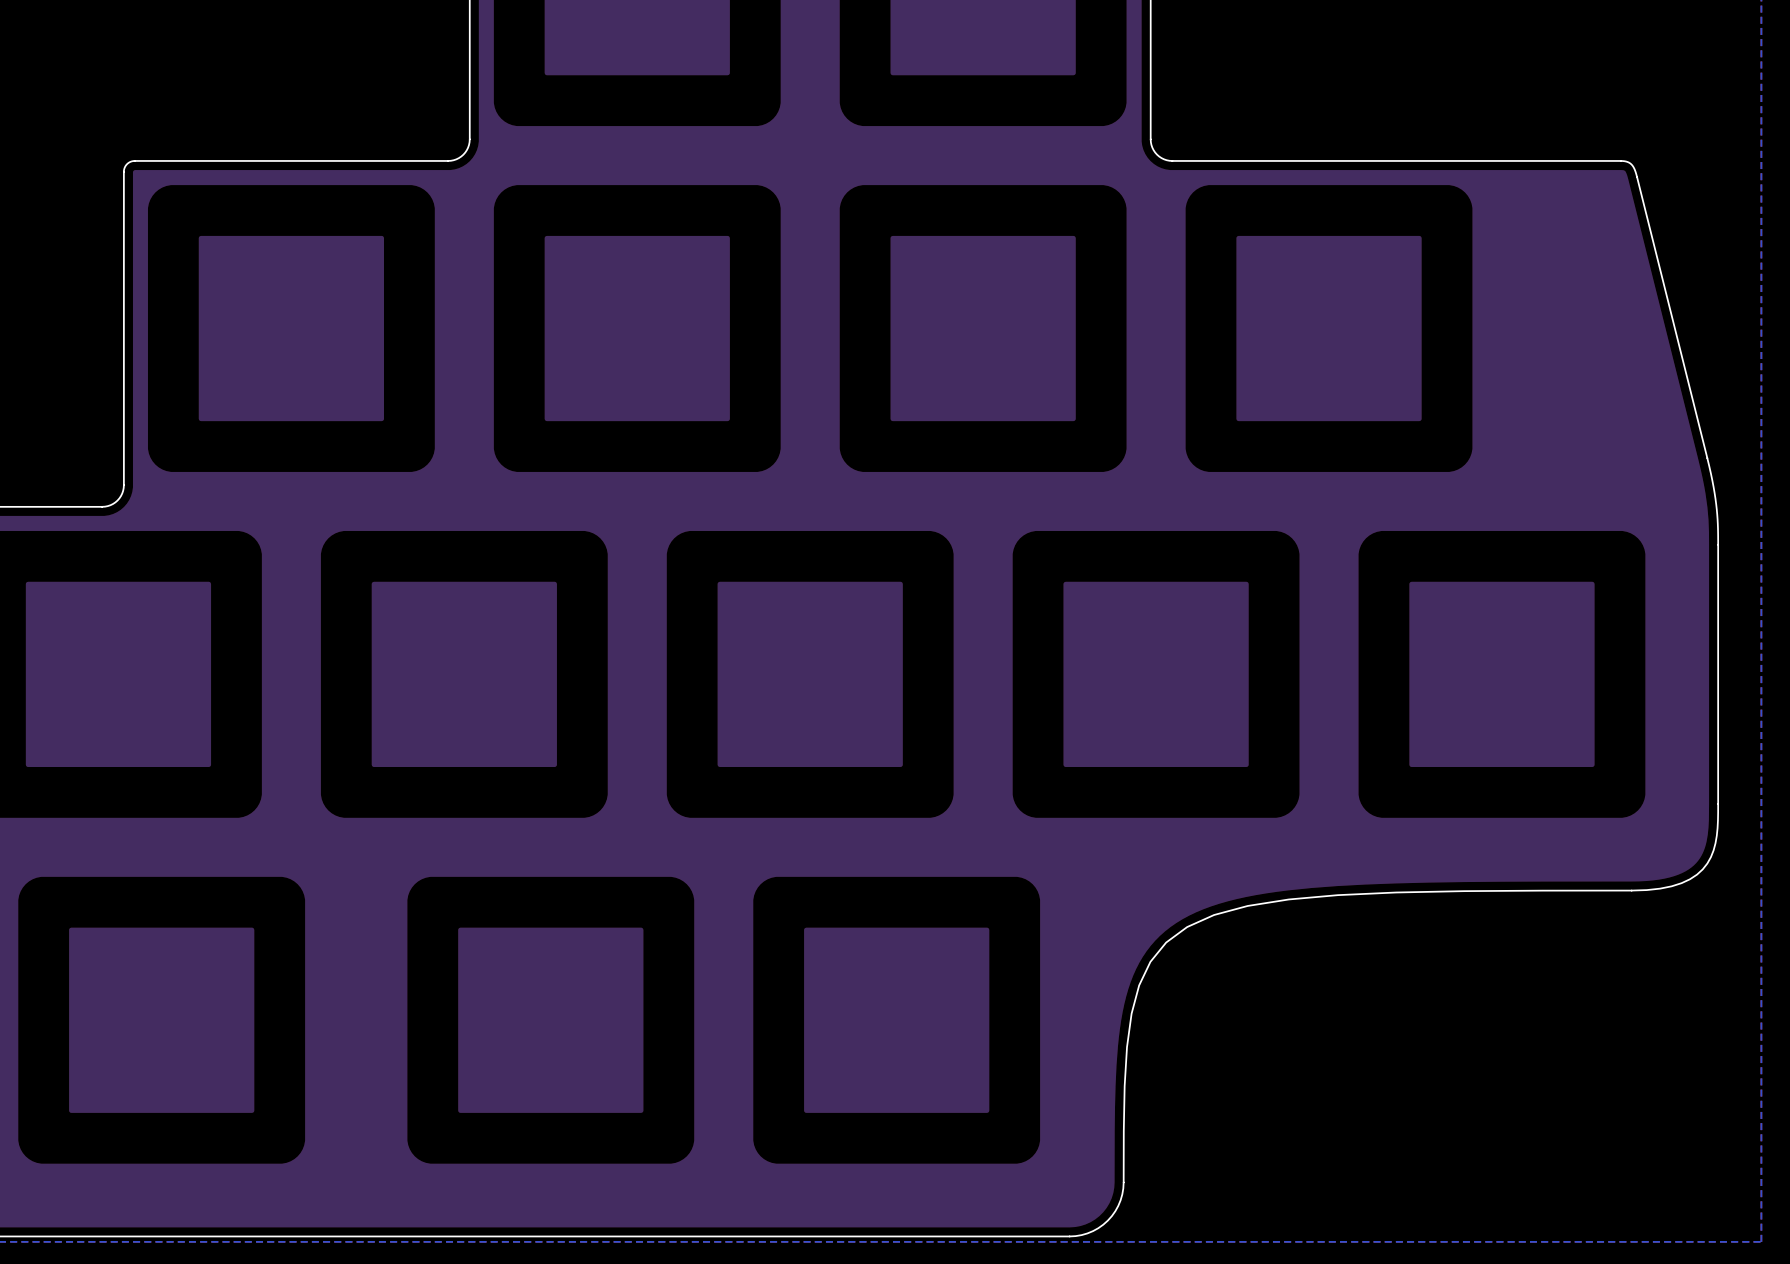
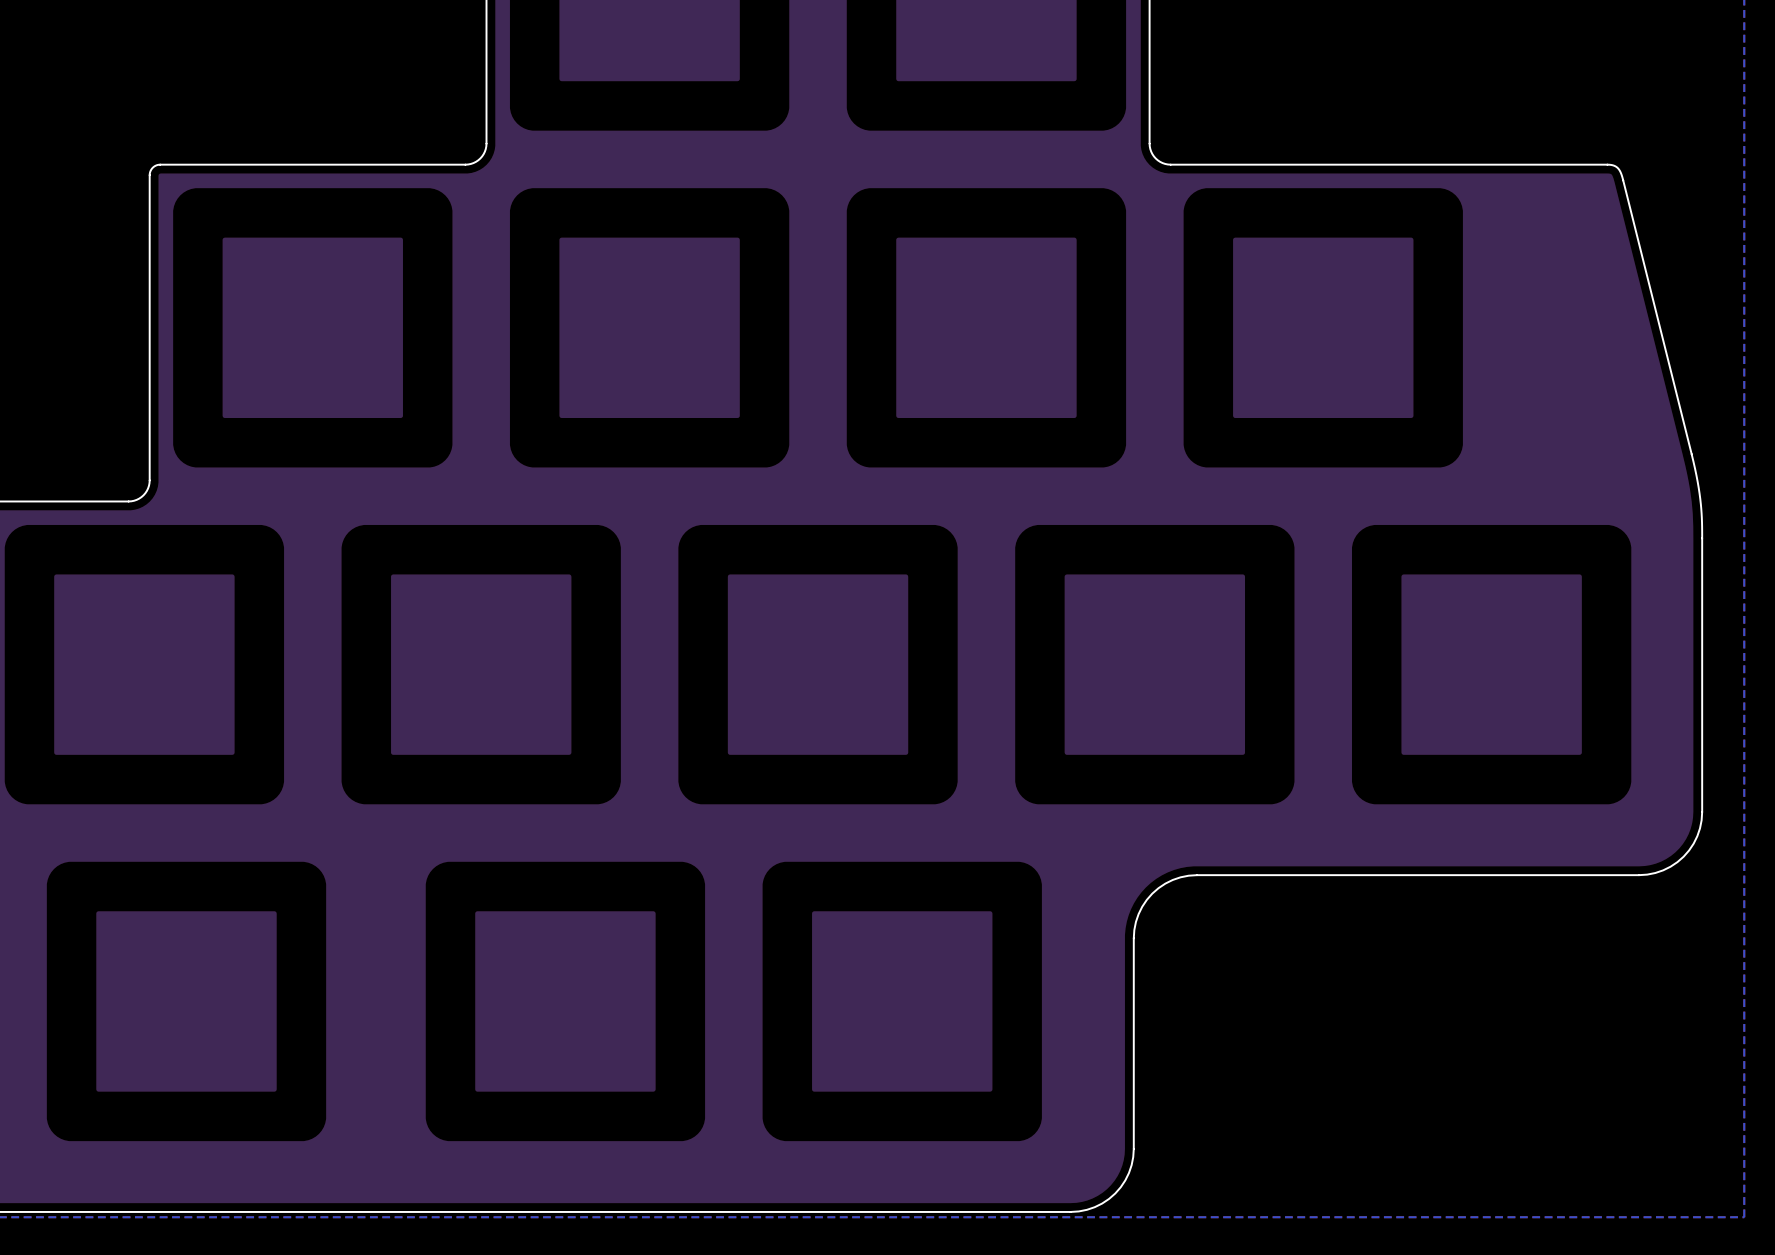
board edge: (1718, 804) (1716, 835) (1710, 857) (1697, 874) (1671, 886) (1631, 890) (1463, 891) (1337, 895) (1288, 899) (1247, 905) (1214, 915) (1187, 927) (1166, 942) (1150, 961) (1139, 985) (1131, 1013) (1124, 1086) (1123, 1182) (1120, 1200) (1111, 1216) (1098, 1228) (1081, 1235) (1069, 1236) -> (1702, 790) (1701, 820) (1693, 843) (1677, 862) (1663, 870) (1647, 874) (1196, 875) (1180, 877) (1165, 883) (1146, 899) (1138, 914) (1134, 930) (1133, 1148) (1131, 1165) (1120, 1187) (1109, 1198) (1094, 1207) (1070, 1211)

